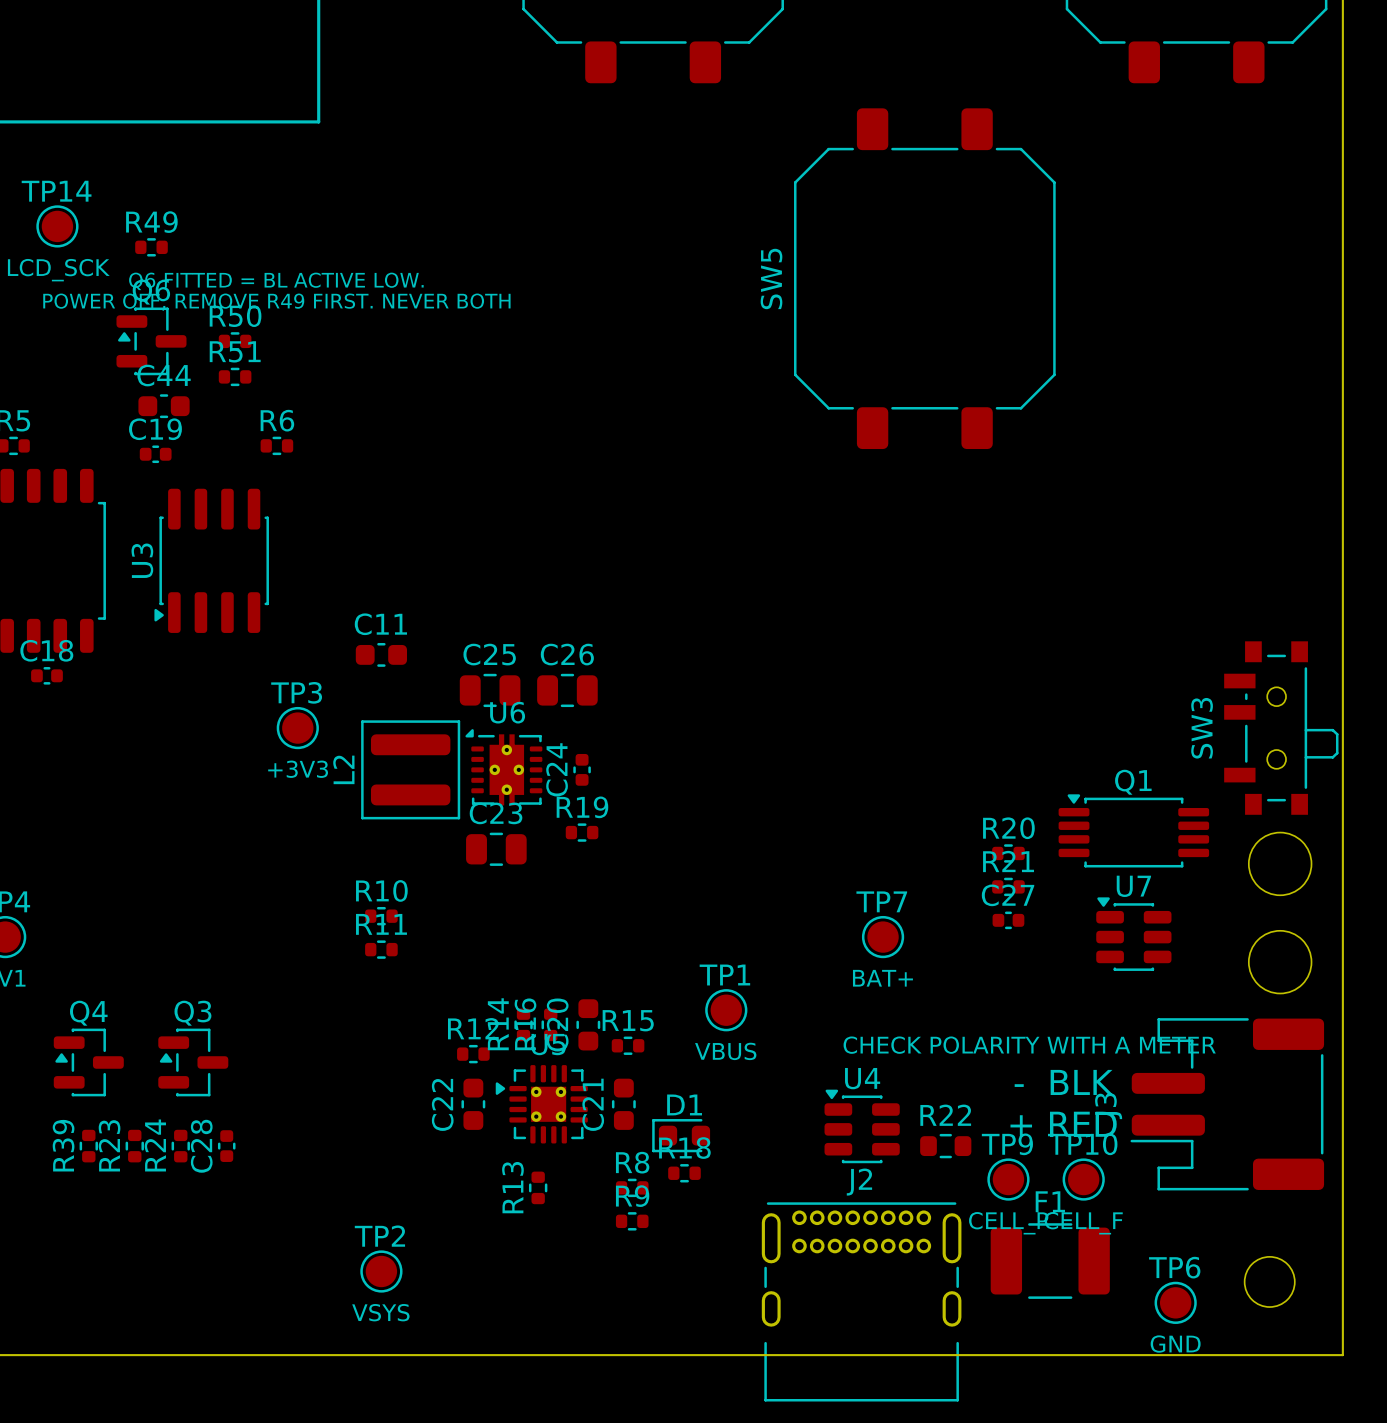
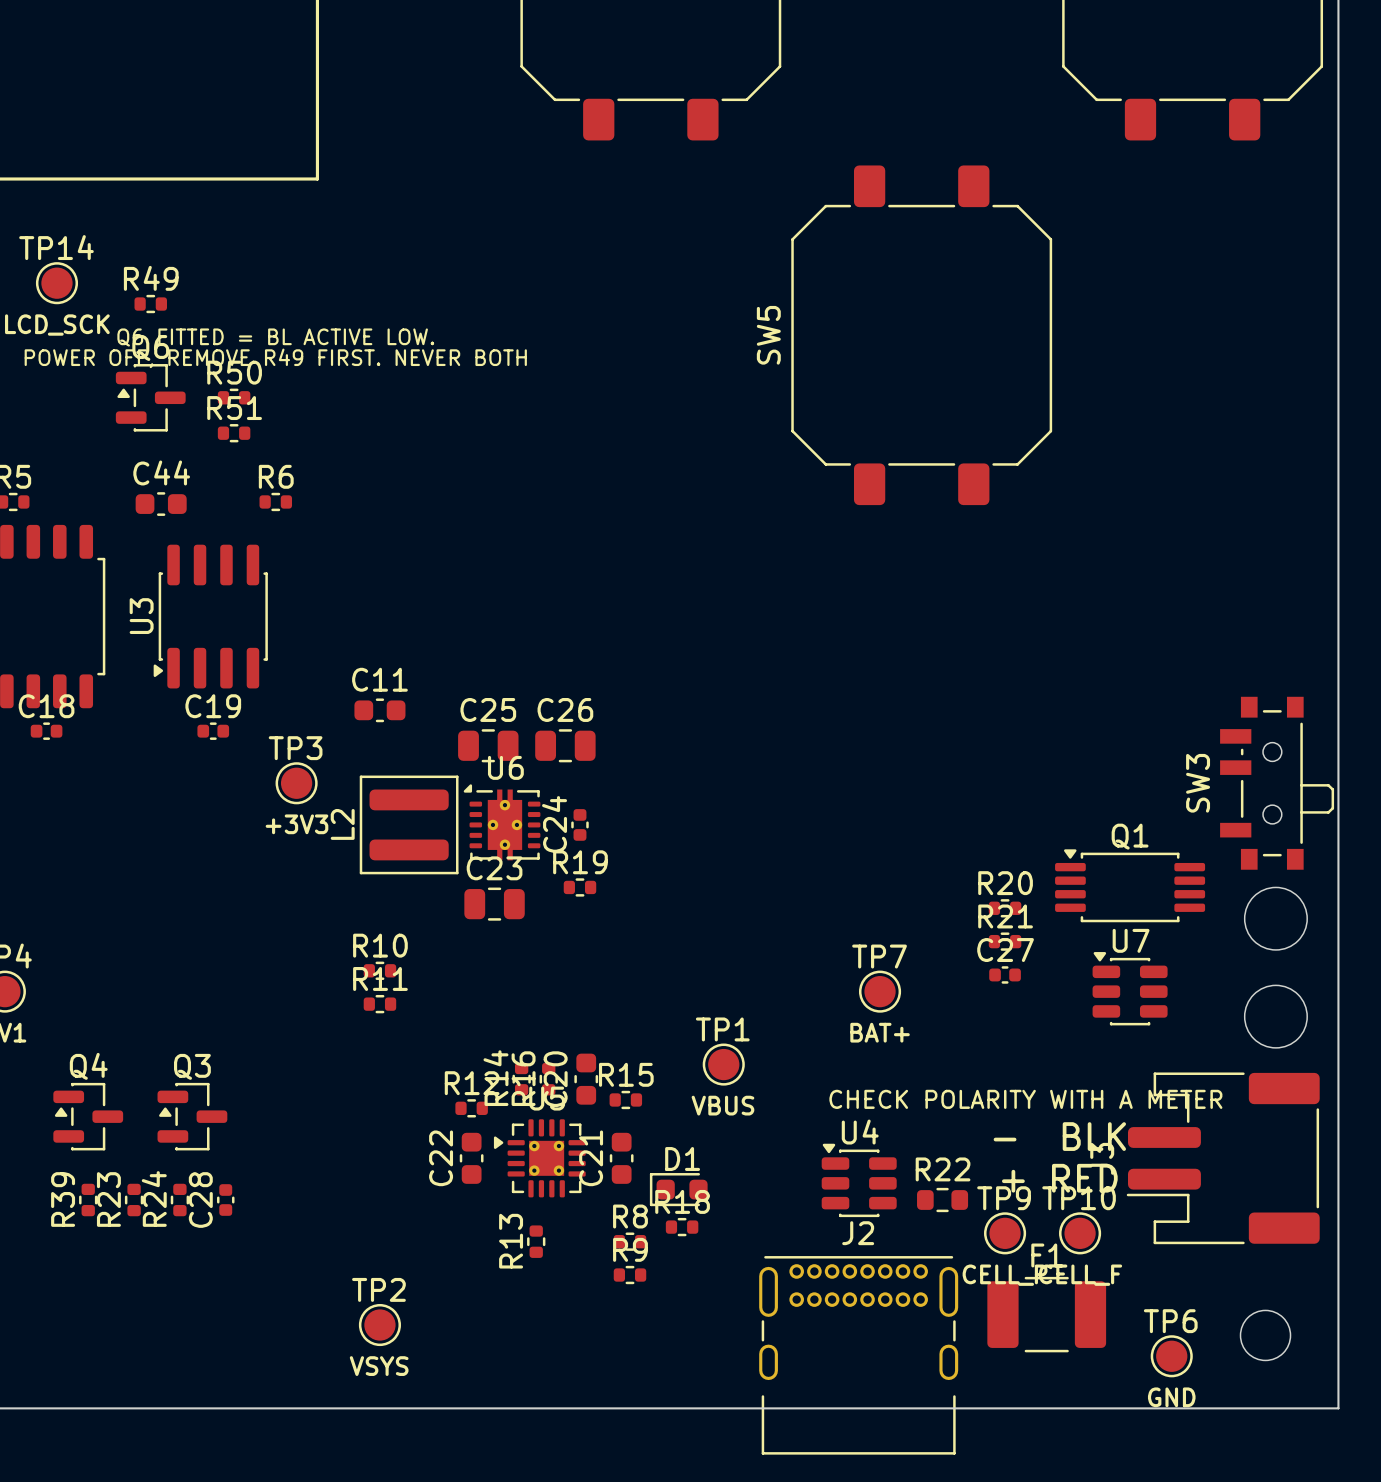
C44 position: (164, 406) -> (161, 504)
C19 position: (155, 454) -> (213, 731)

